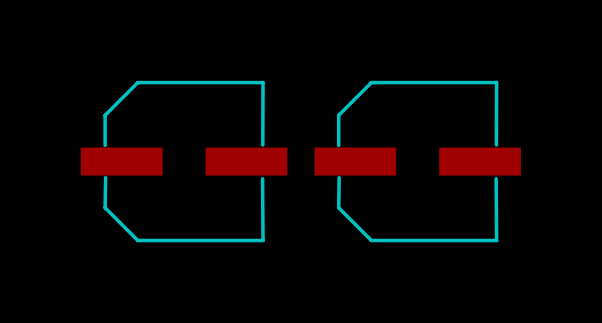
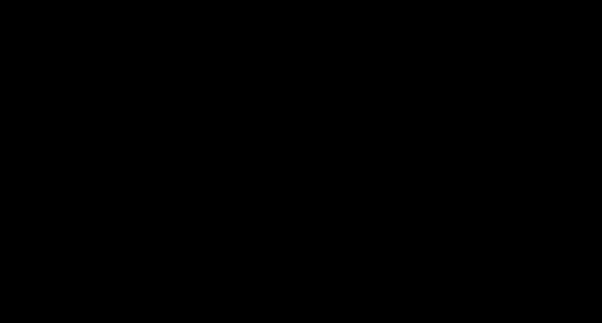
part: (184, 161) -> none
part: (417, 161) -> none

